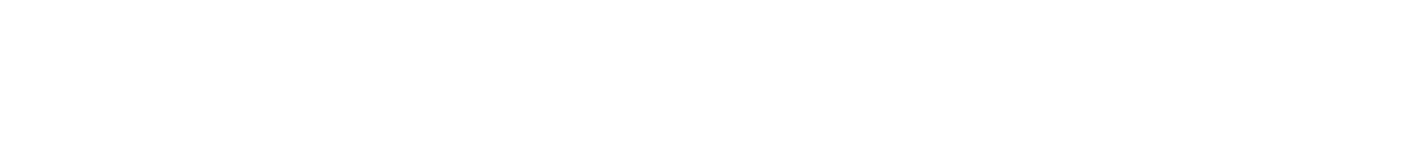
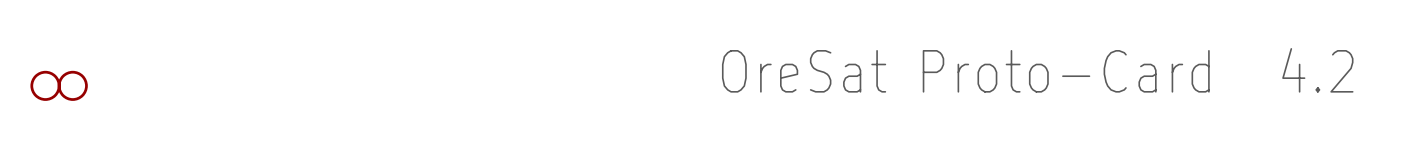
text: none -> 4.2 (1317, 70)
text: none -> OreSat Proto-Card (965, 71)
part: none -> (45, 85)
part: none -> (72, 85)

